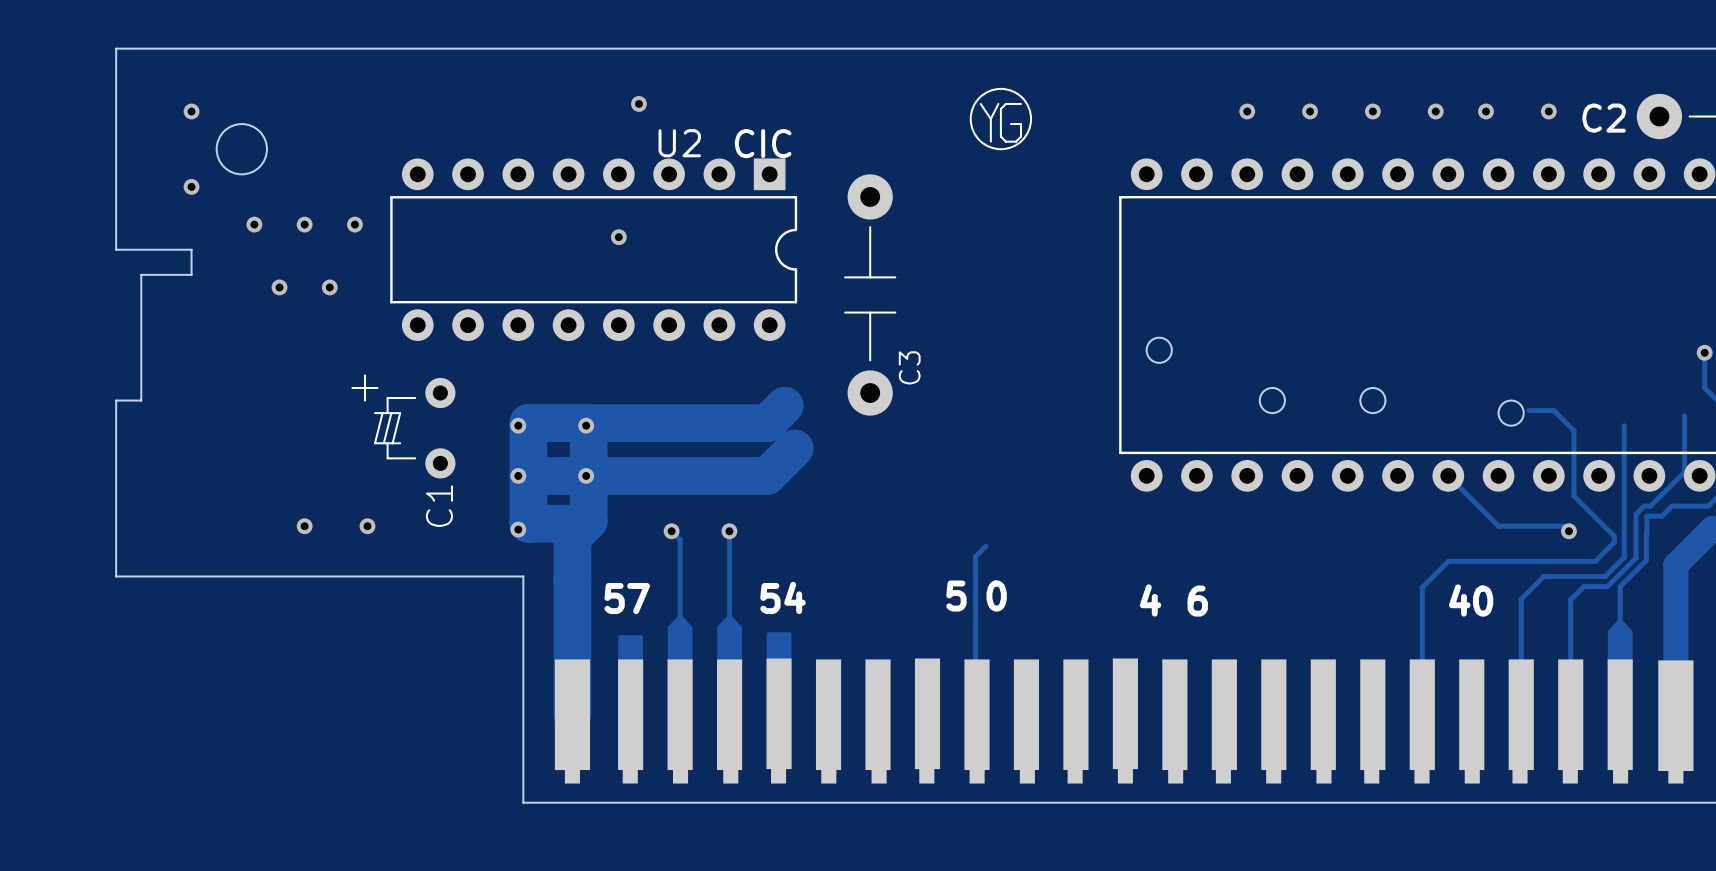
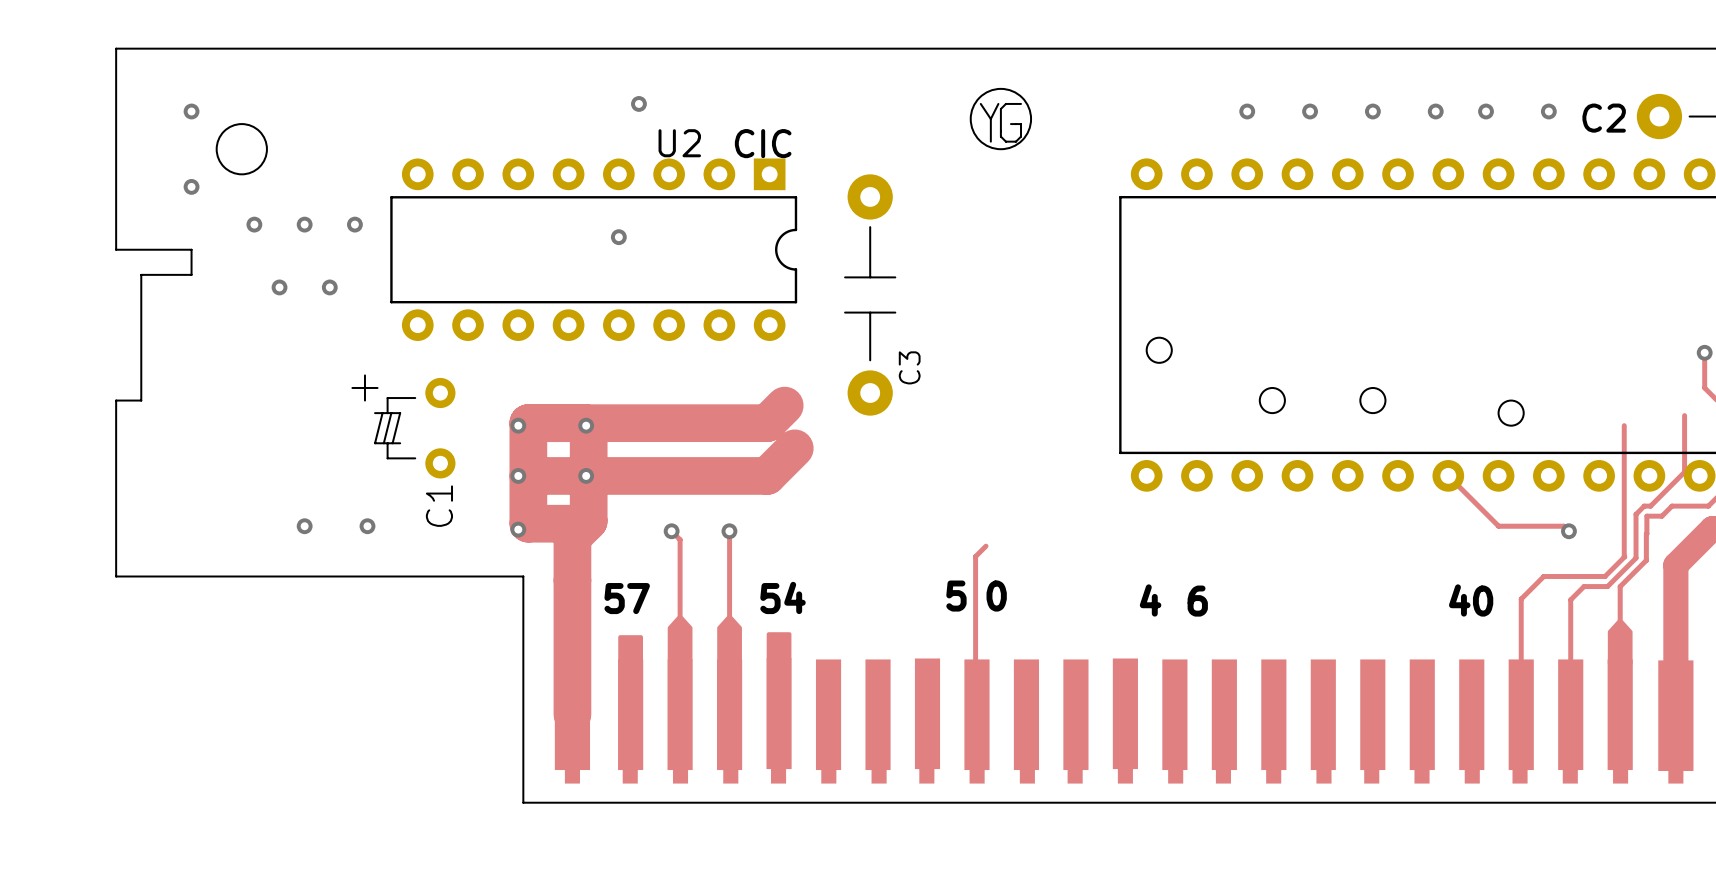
track: (1528, 410) (1553, 410) (1573, 430) (1573, 496) (1614, 536) (1614, 542) (1595, 561) (1448, 561) (1422, 587) (1422, 714) -> none

